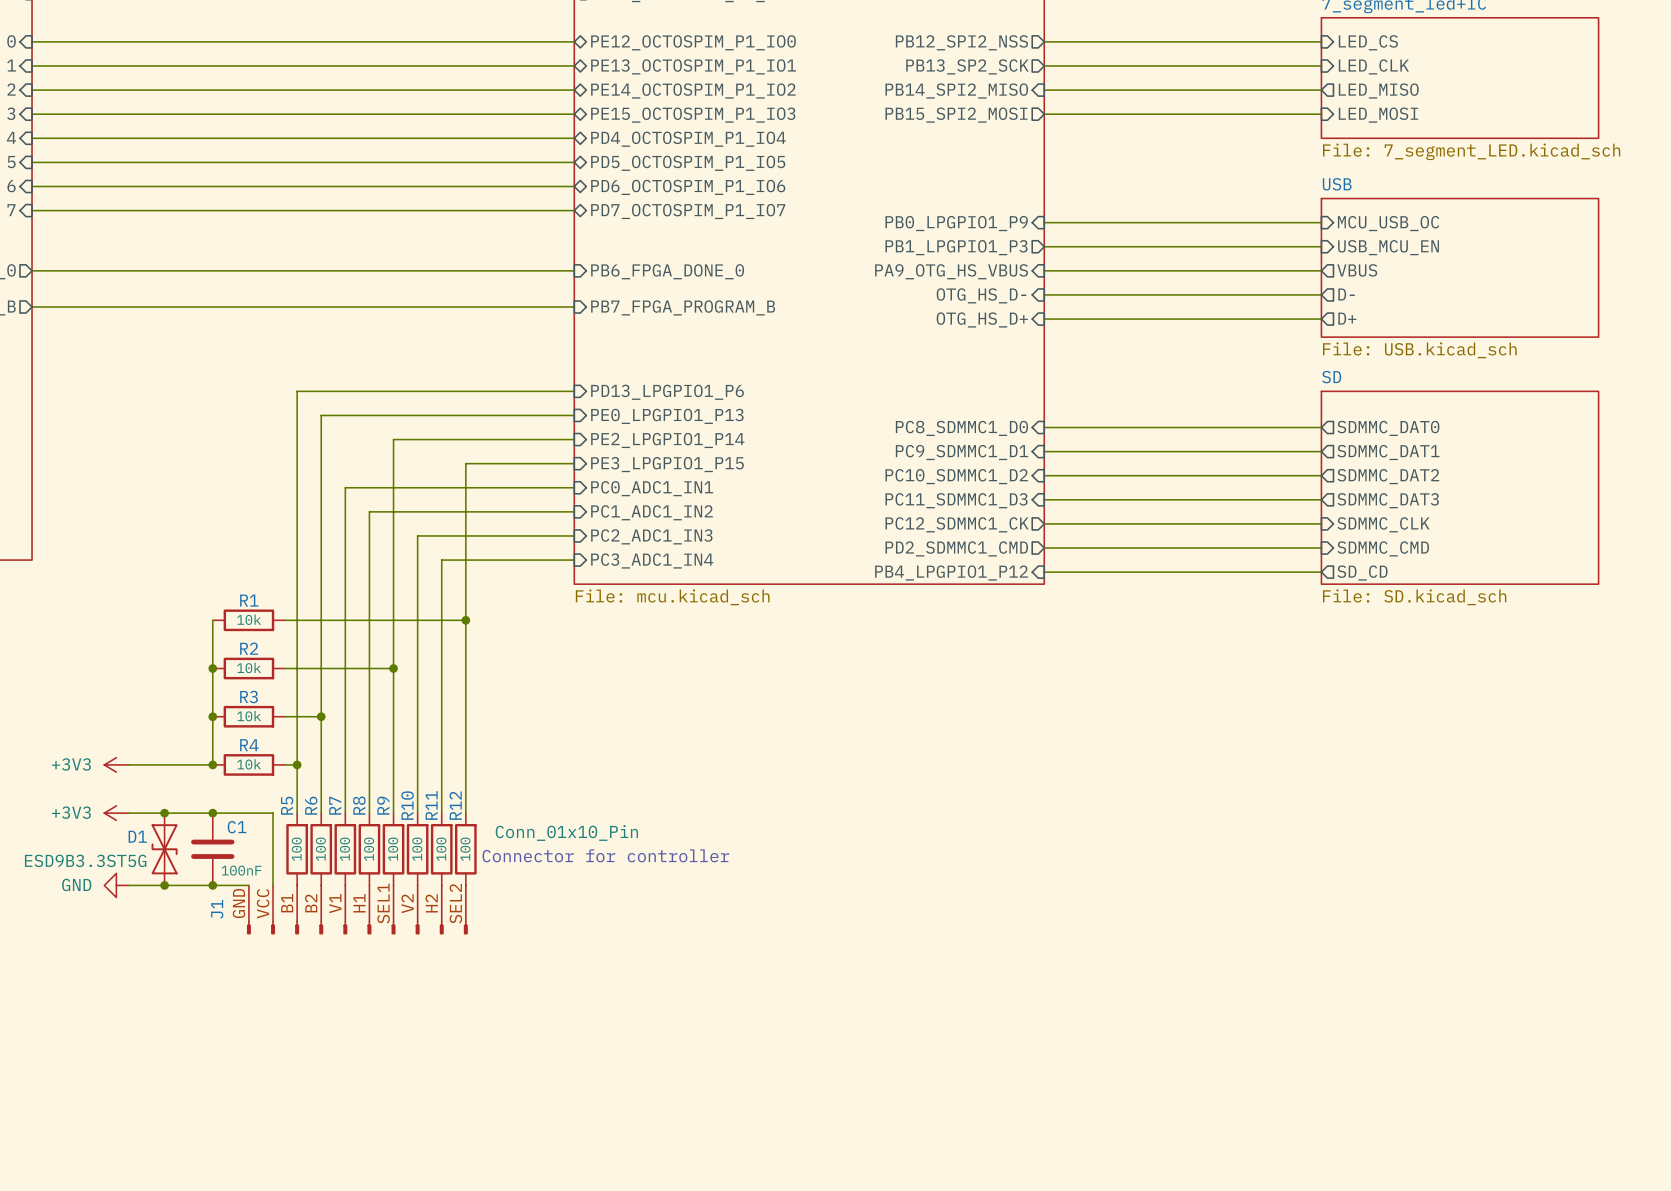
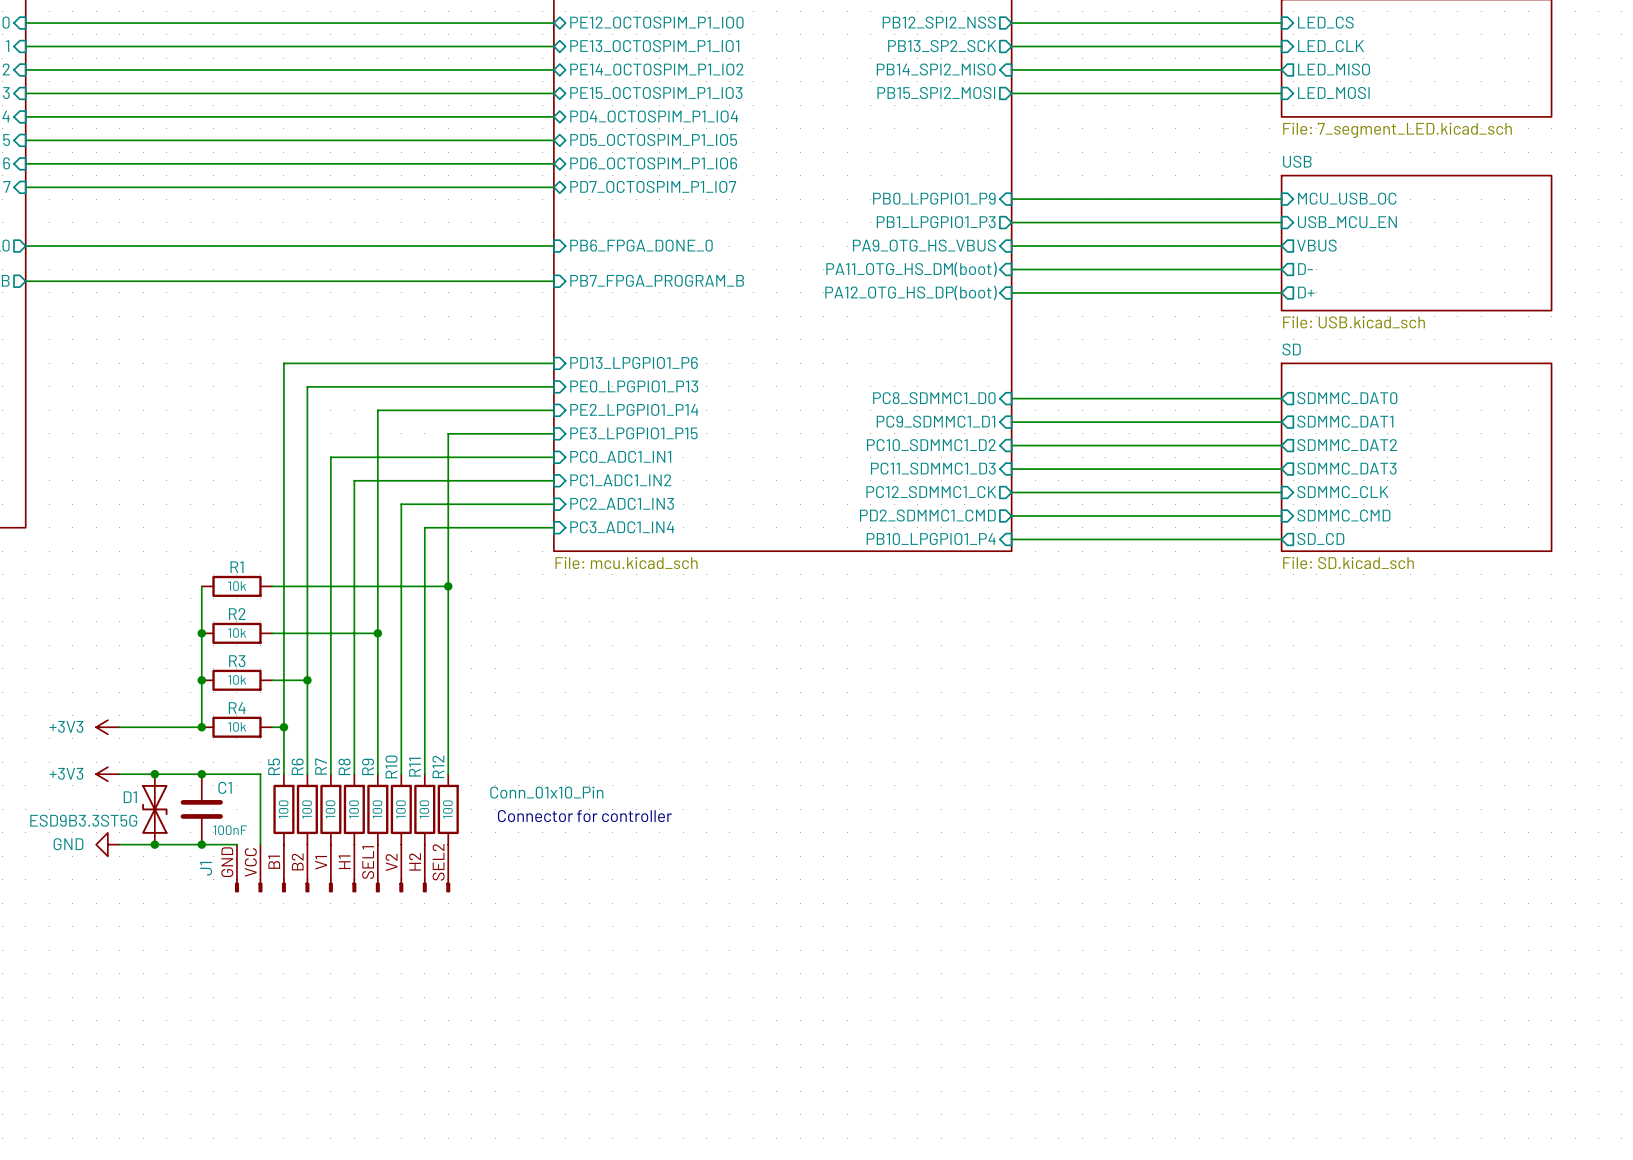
sheet pin: OTG_HS_D- (981, 295) -> PA11_OTG_HS_DM(boot) (911, 269)
sheet pin: OTG_HS_D+ (982, 319) -> PA12_OTG_HS_DP(boot) (911, 292)
sheet pin: PB4_LPGPIO1_P12 (951, 573) -> PB10_LPGPIO1_P4 (931, 539)

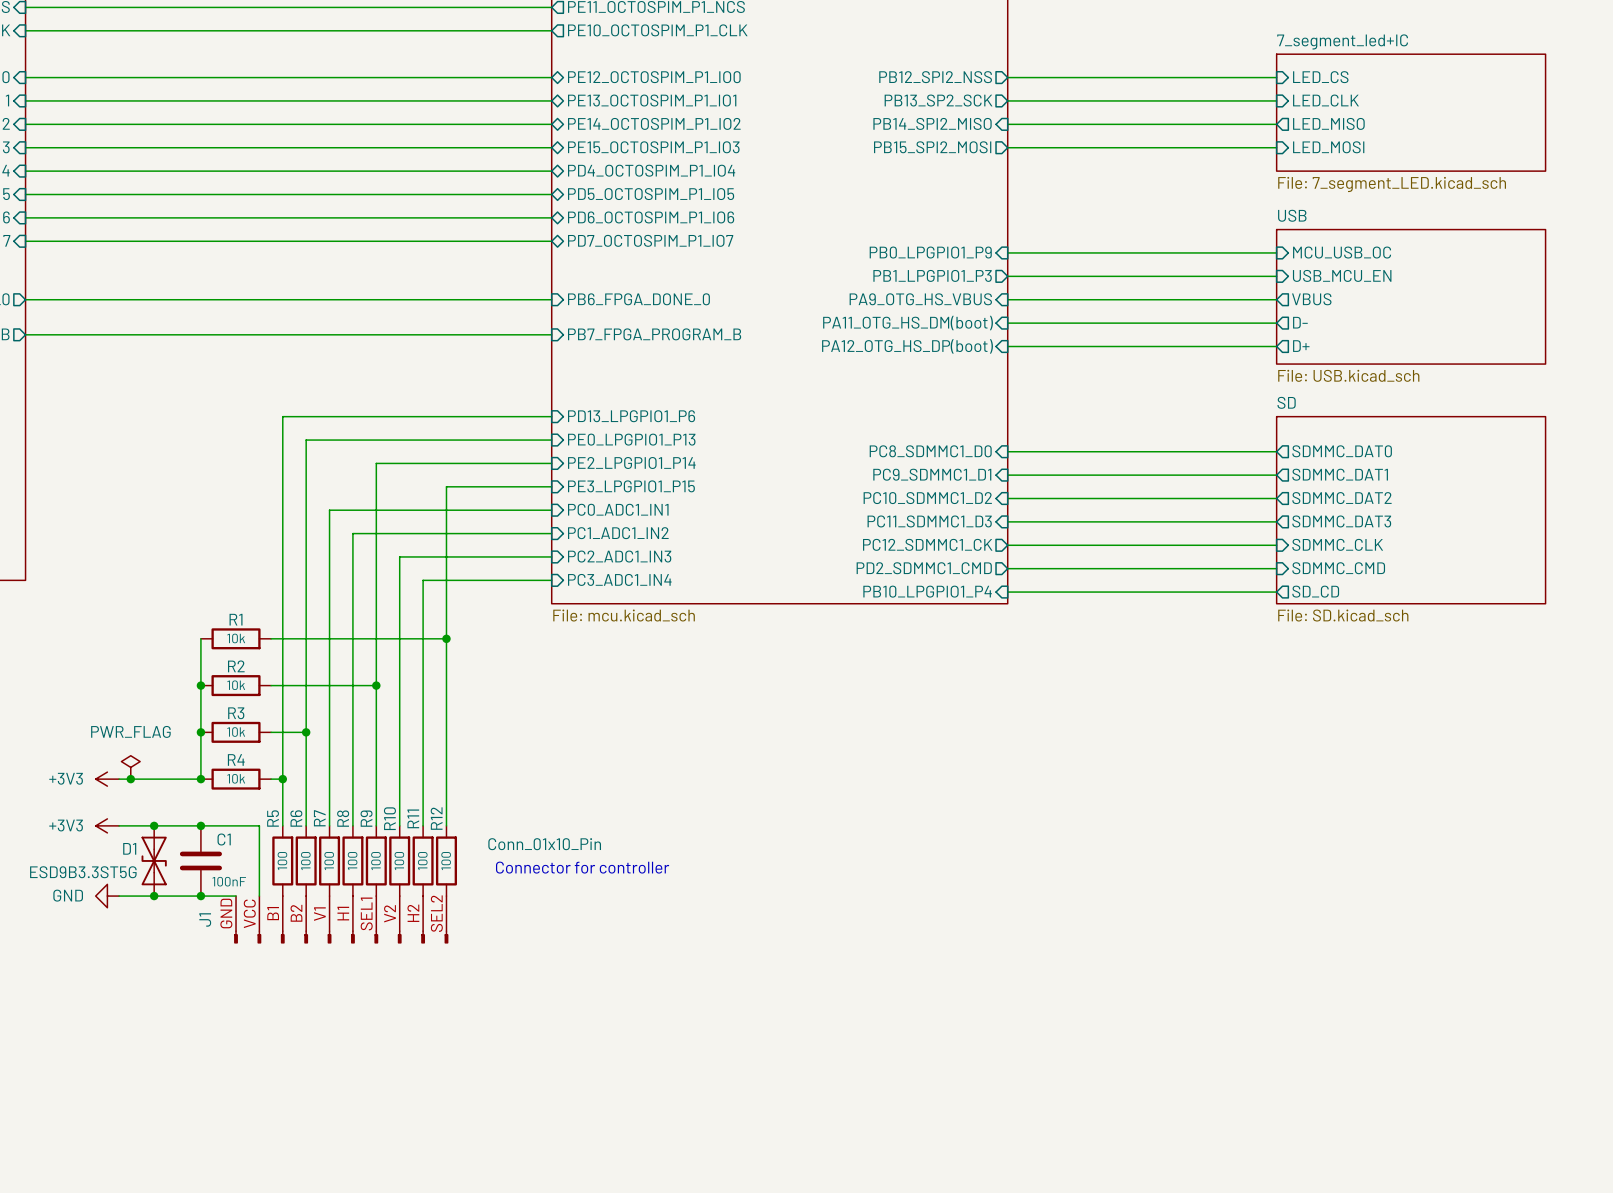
power symbol: none -> PWR_FLAG (130, 767)
junction: none -> (130, 779)

